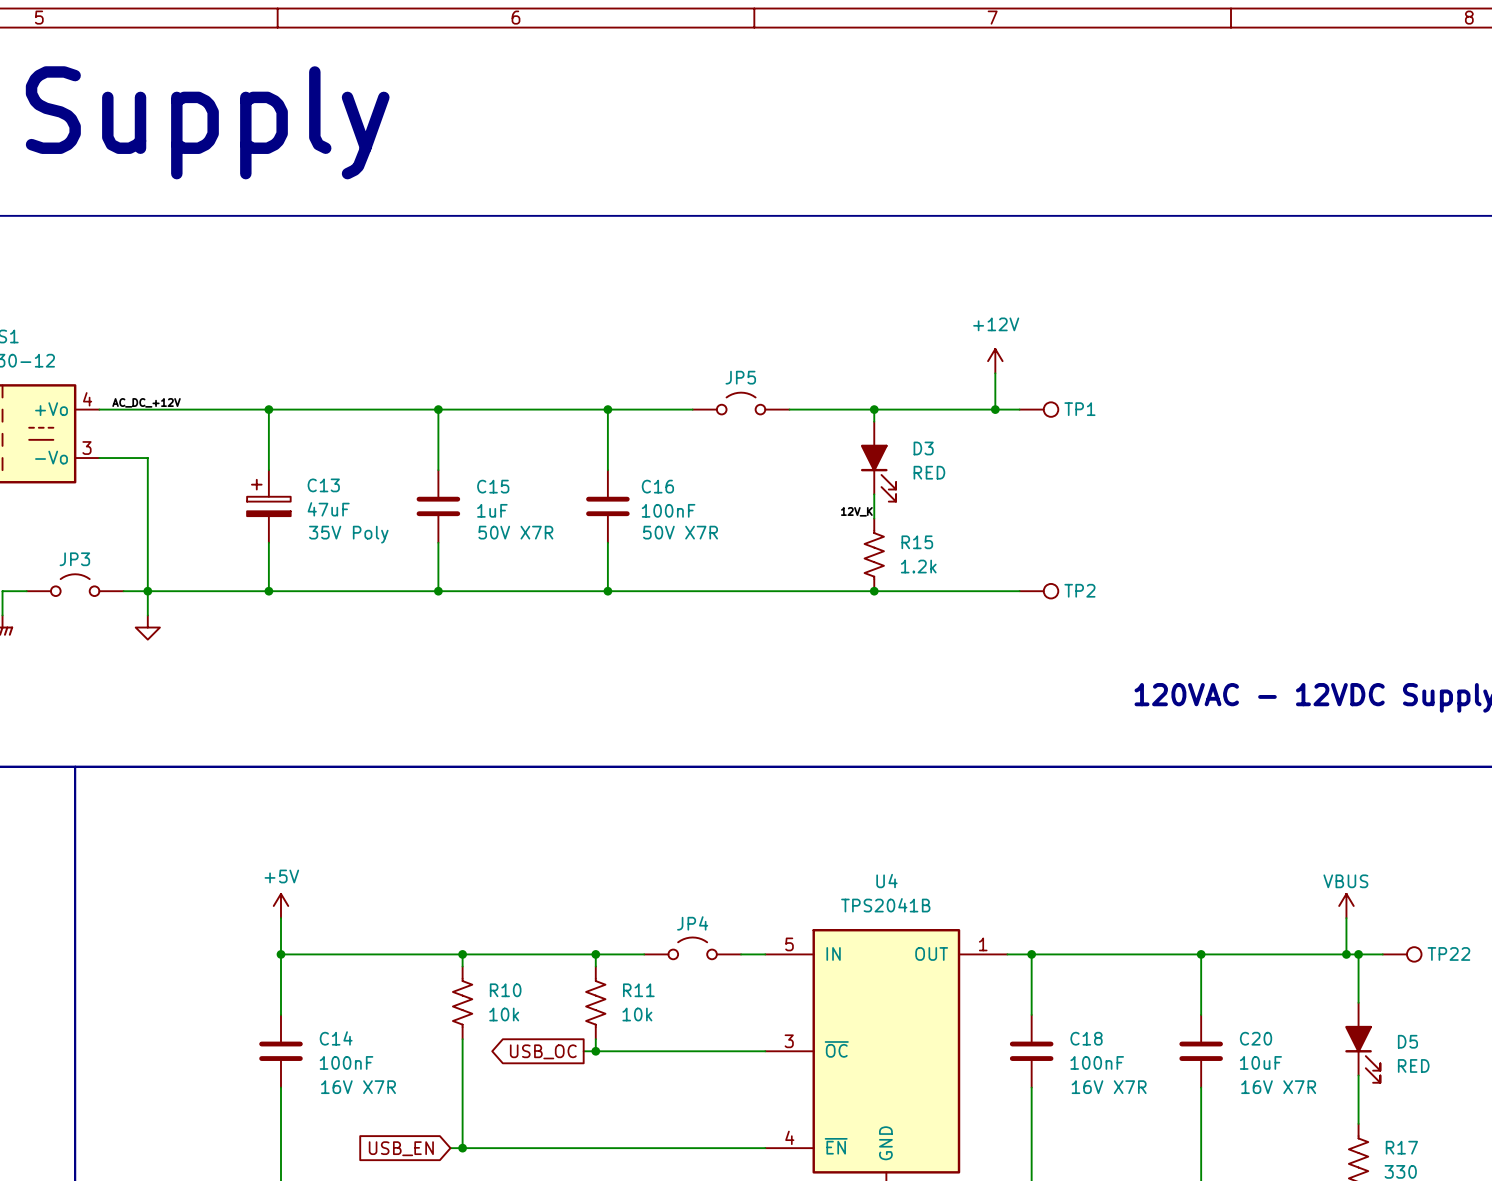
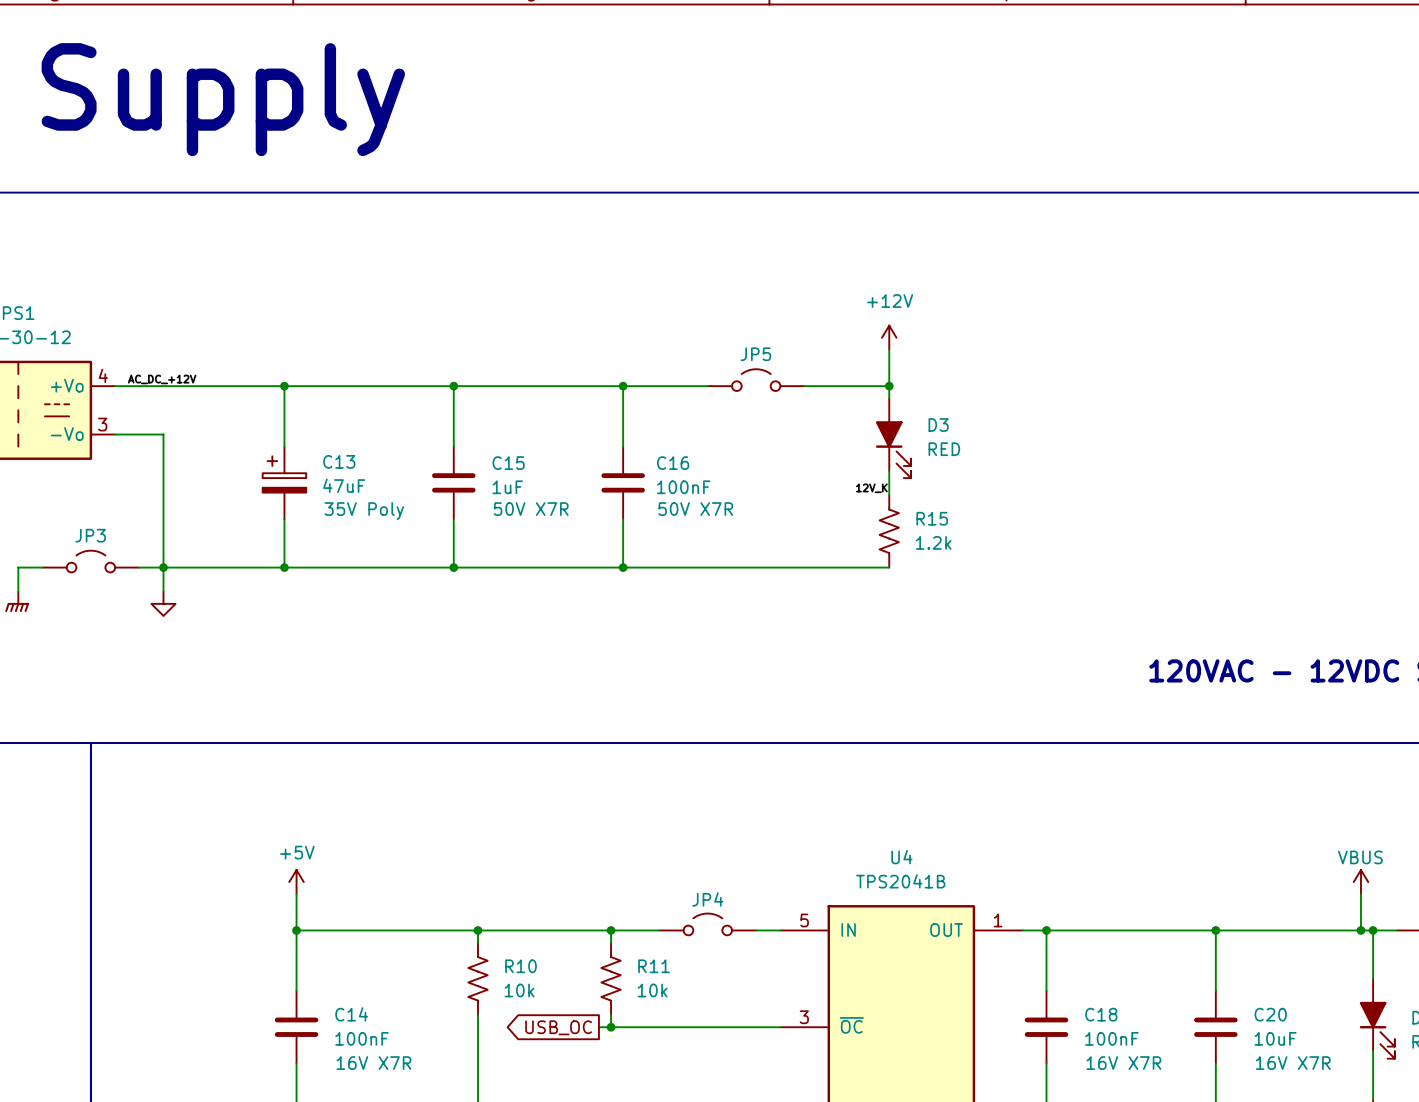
power symbol position: +12V (995, 361) -> +12V (889, 337)
wire: (995, 373) (995, 409) -> none
wire: (874, 409) (1019, 409) -> (889, 386) (889, 349)
junction: (995, 409) -> none
TP1: (1038, 409) -> none
wire: (874, 591) (1019, 591) -> none
junction: (874, 591) -> none
TP2: (1038, 591) -> none

